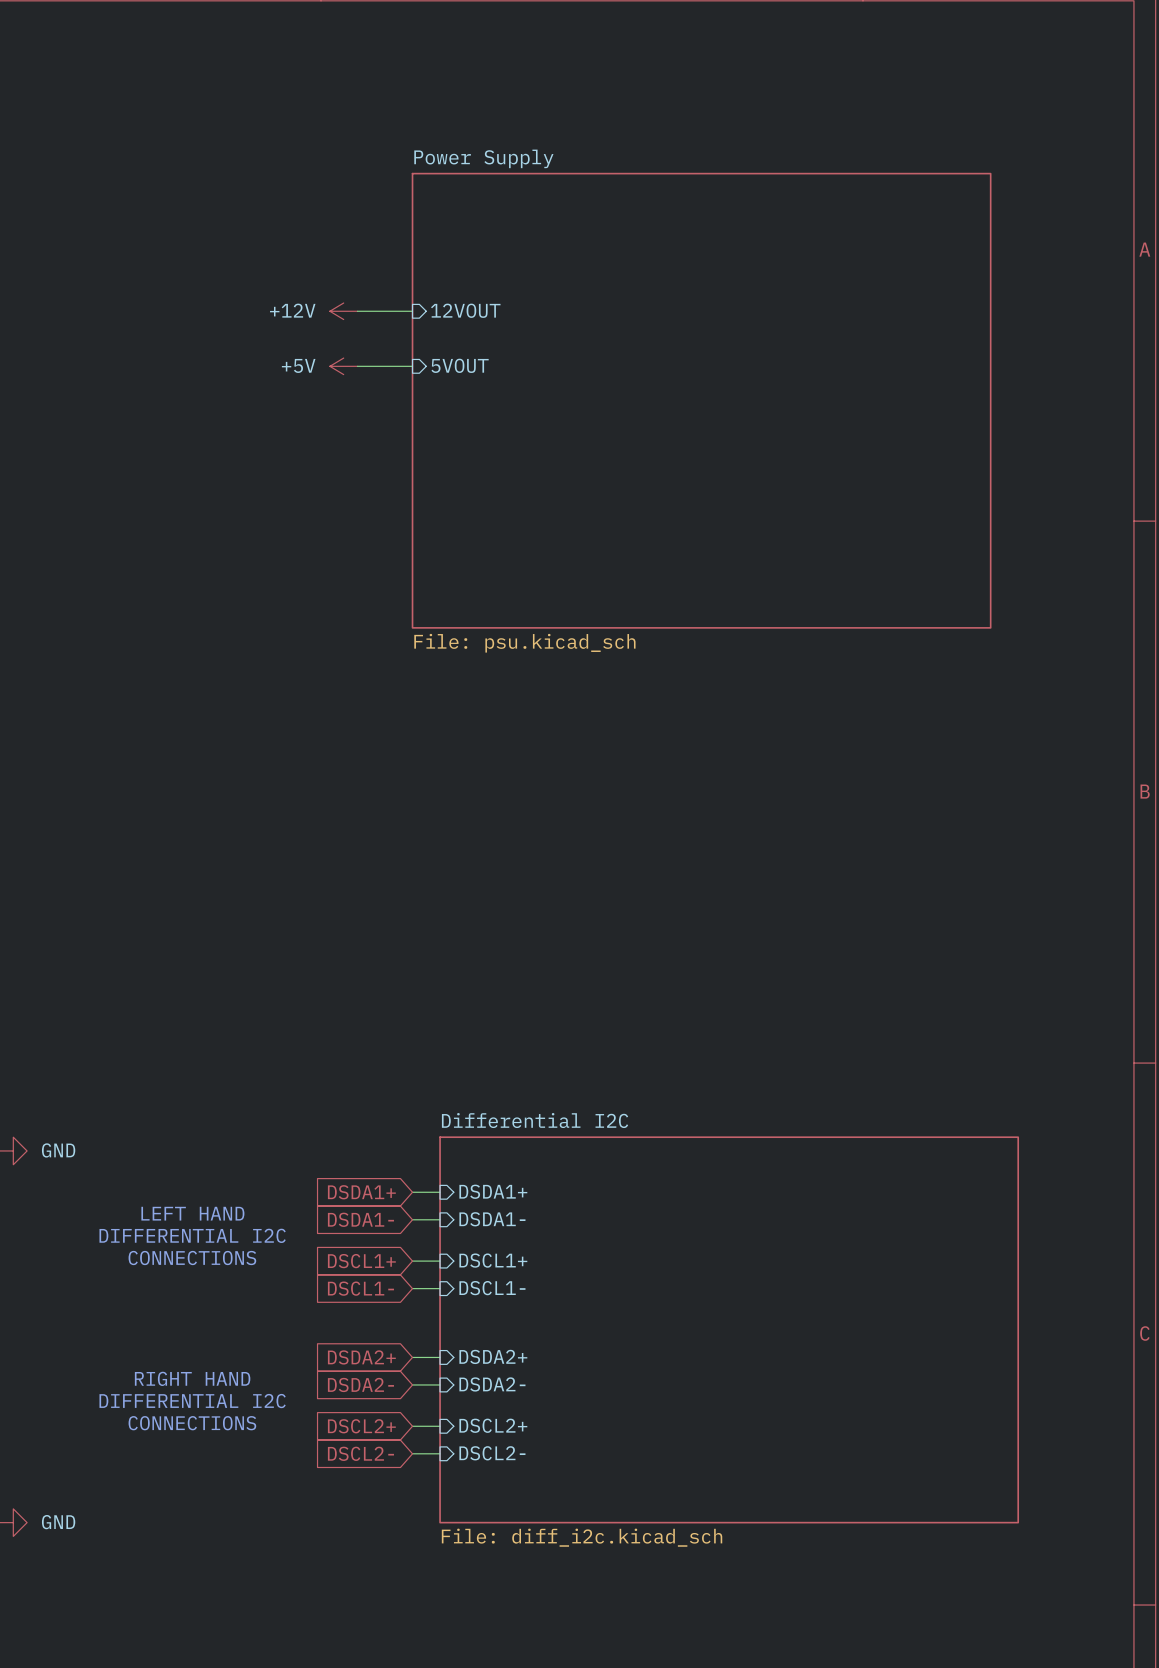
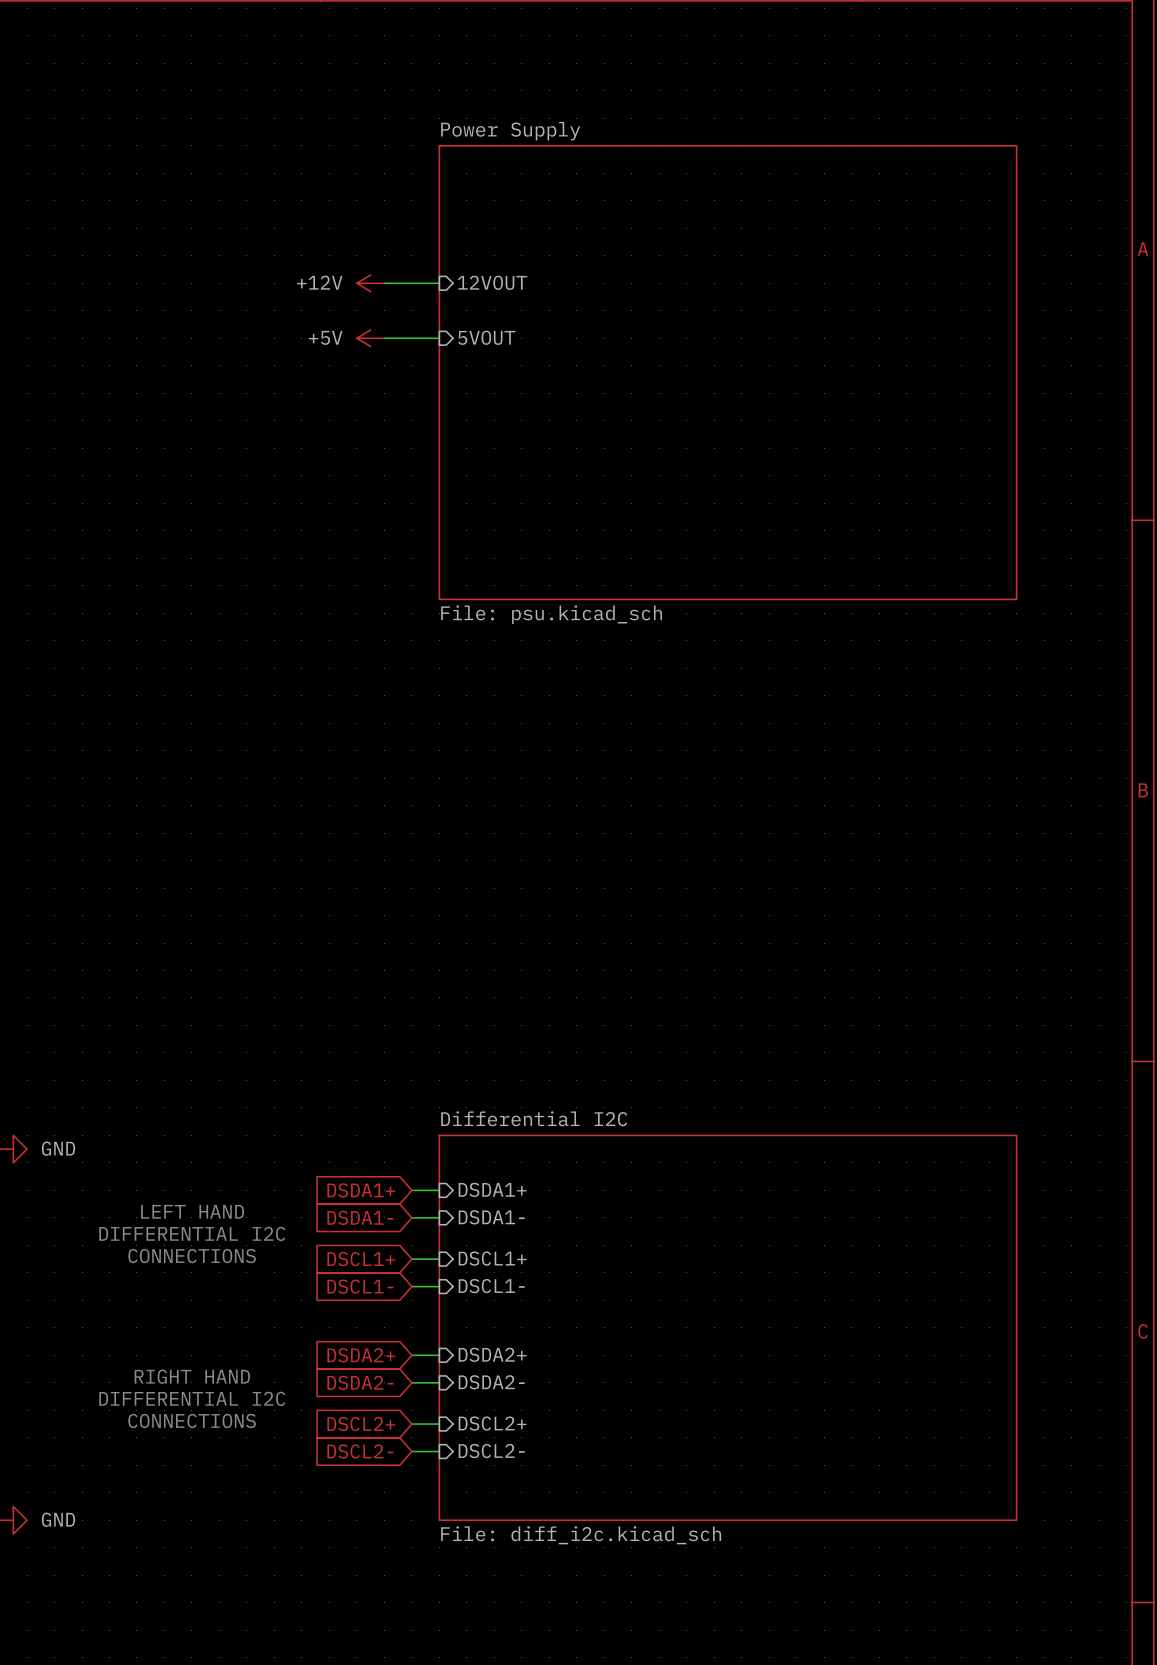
sheet pin position: 12VOUT (465, 310) -> 12VOUT (492, 282)
power symbol position: +12V (343, 311) -> +12V (370, 283)
wire: (357, 311) (412, 311) -> (384, 283) (439, 283)
sheet pin position: 5VOUT (460, 365) -> 5VOUT (486, 337)
power symbol position: +5V (343, 366) -> +5V (370, 338)
wire: (357, 366) (412, 366) -> (384, 338) (439, 338)
sheet Power Supply position: (701, 400) -> (727, 372)

